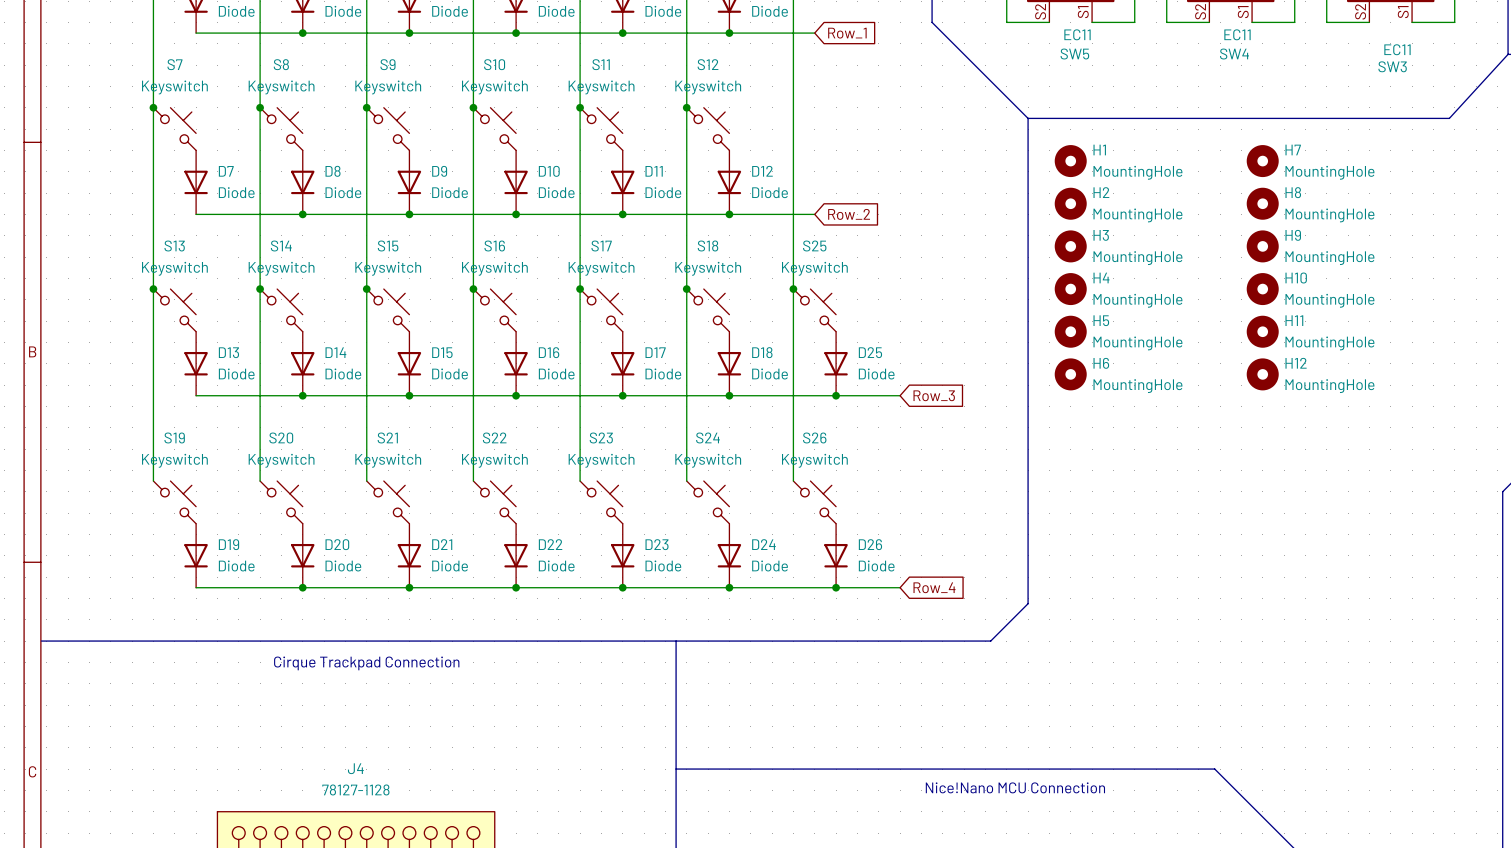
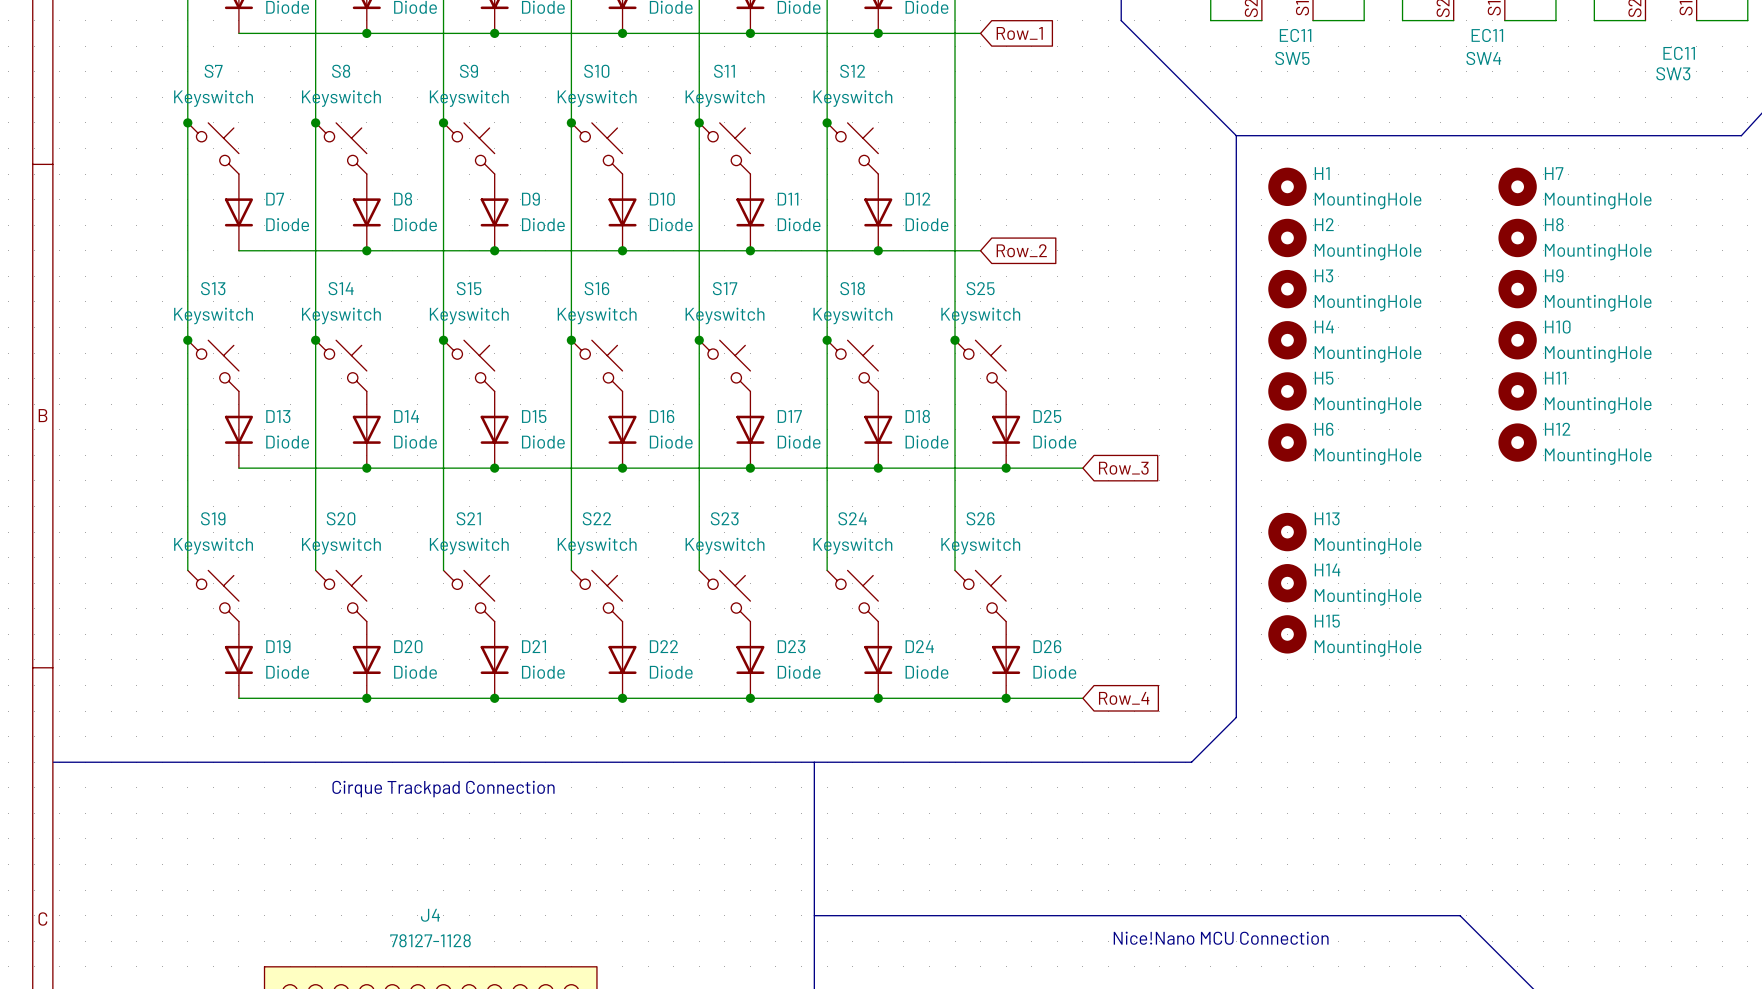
H13: none -> MountingHole (1287, 532)
H14: none -> MountingHole (1287, 583)
H15: none -> MountingHole (1287, 634)

